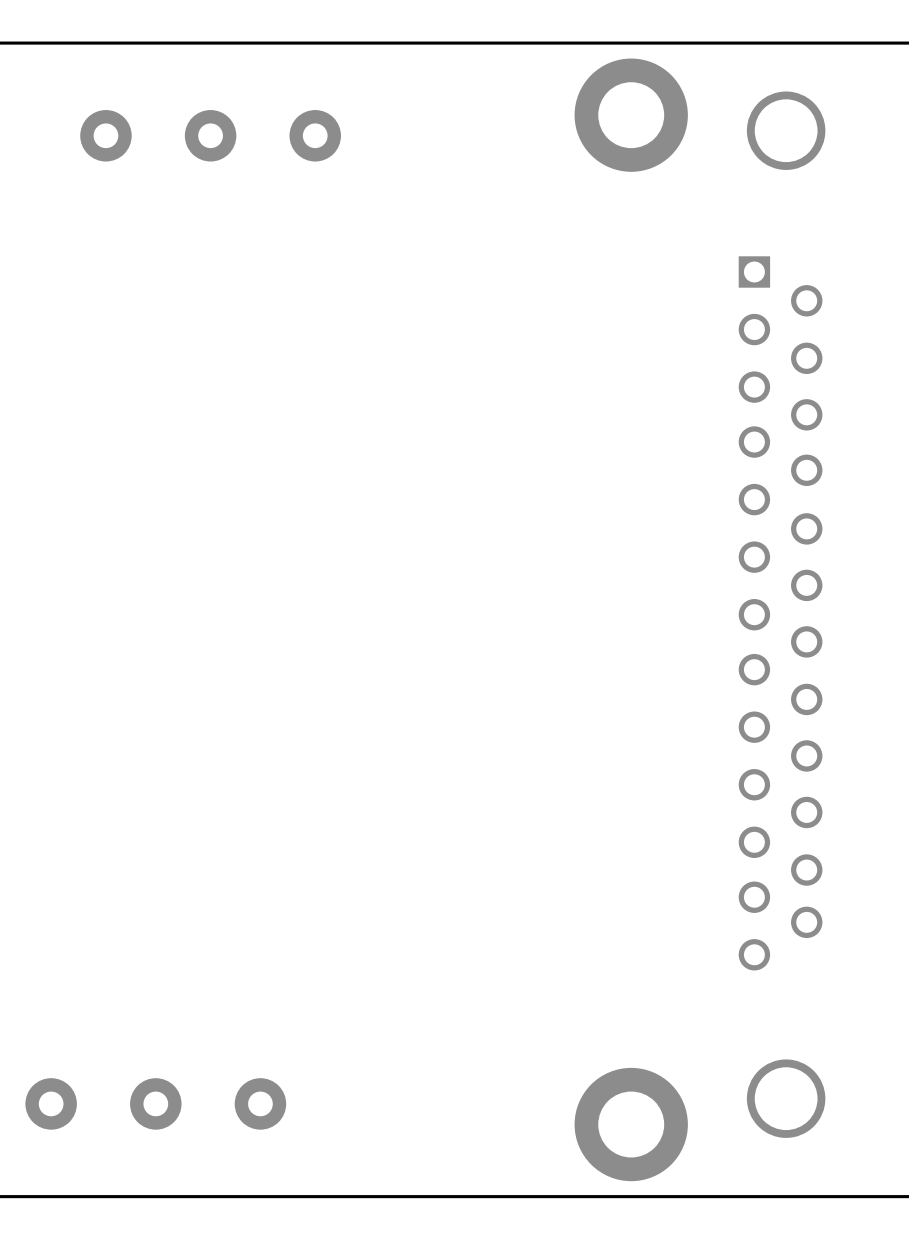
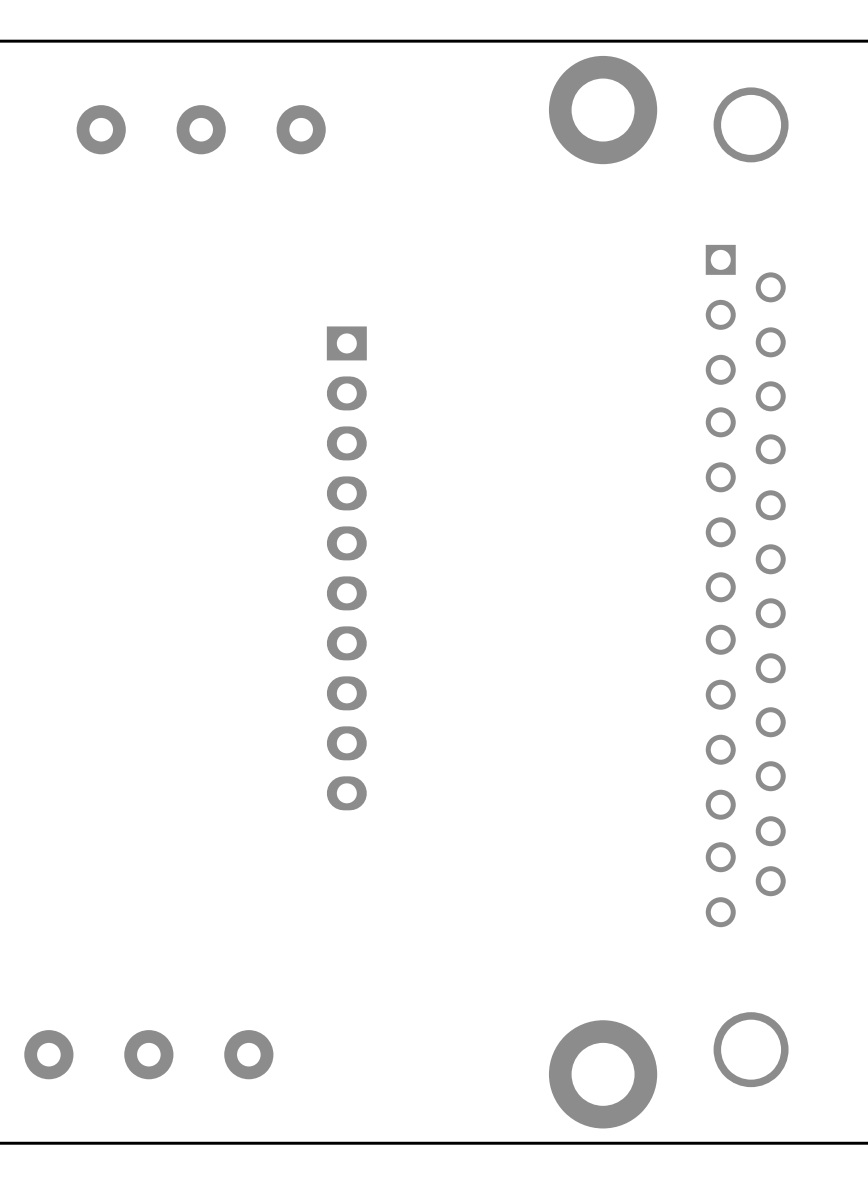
part: none -> (346, 568)

